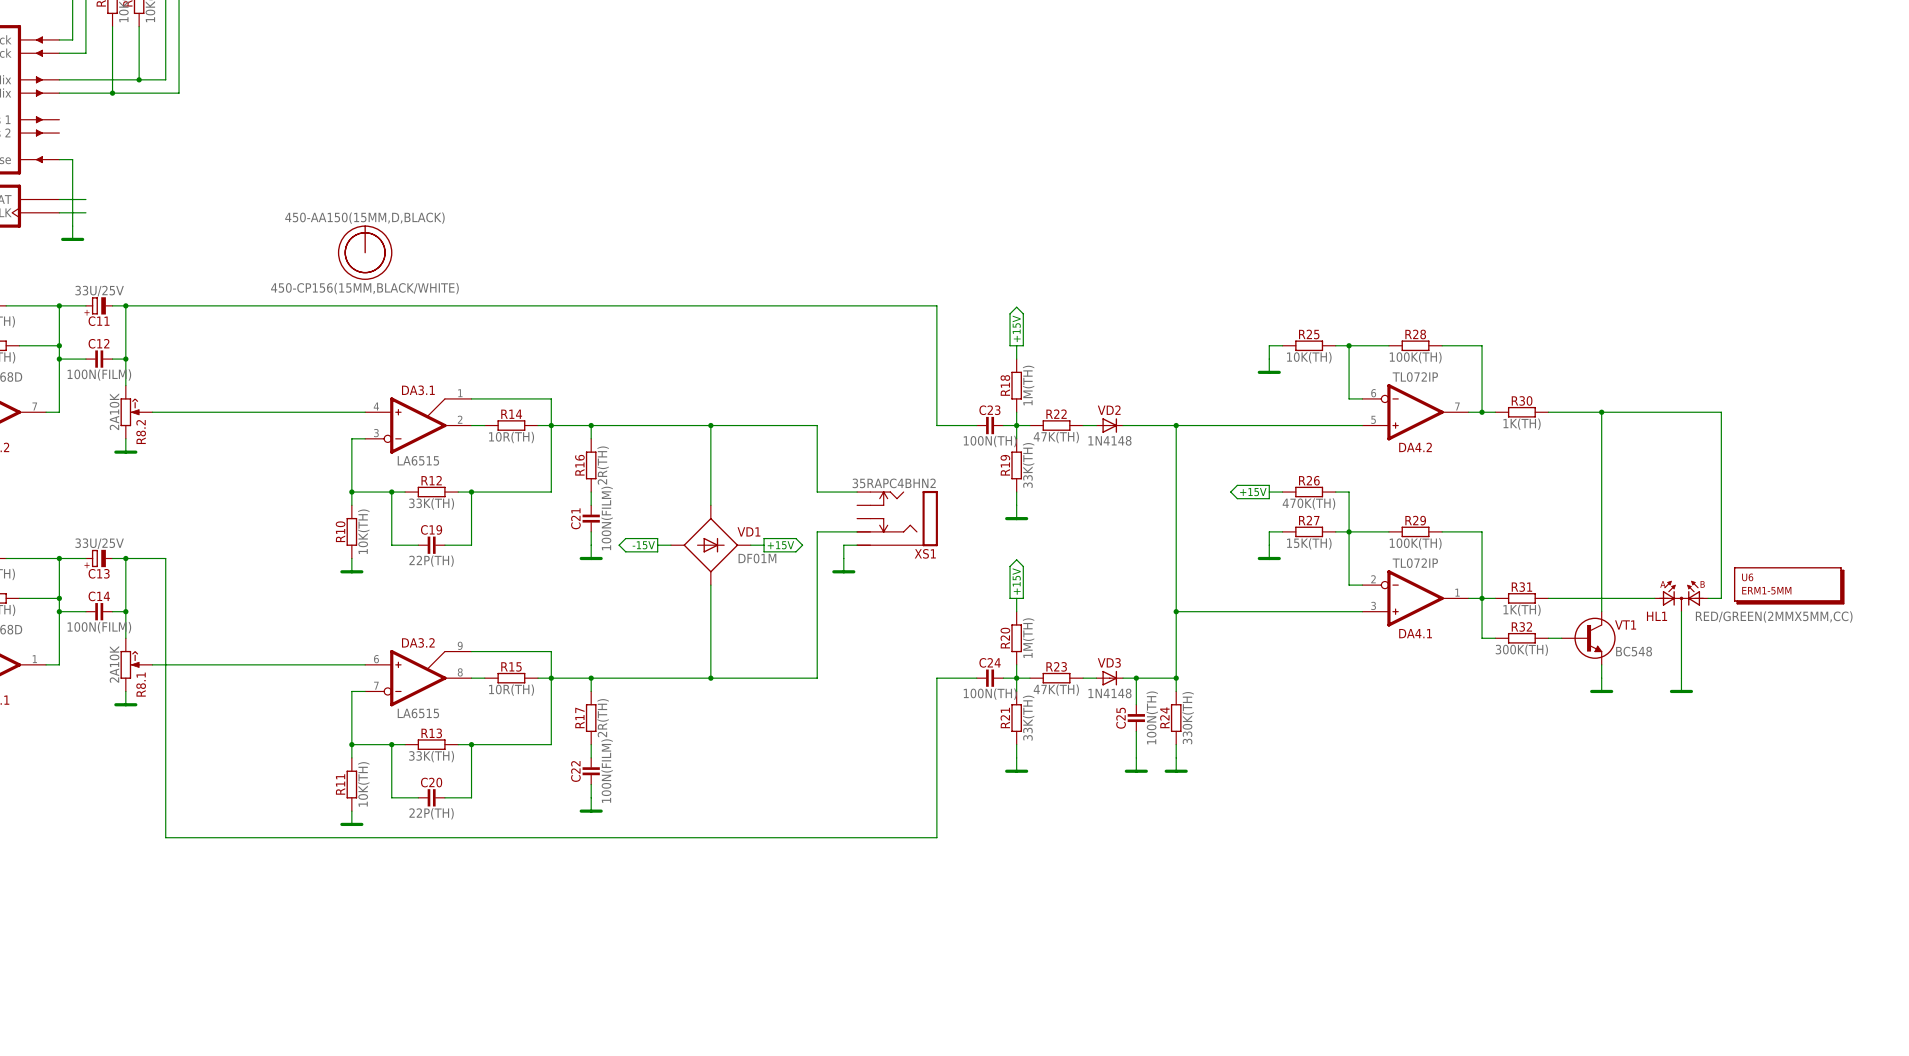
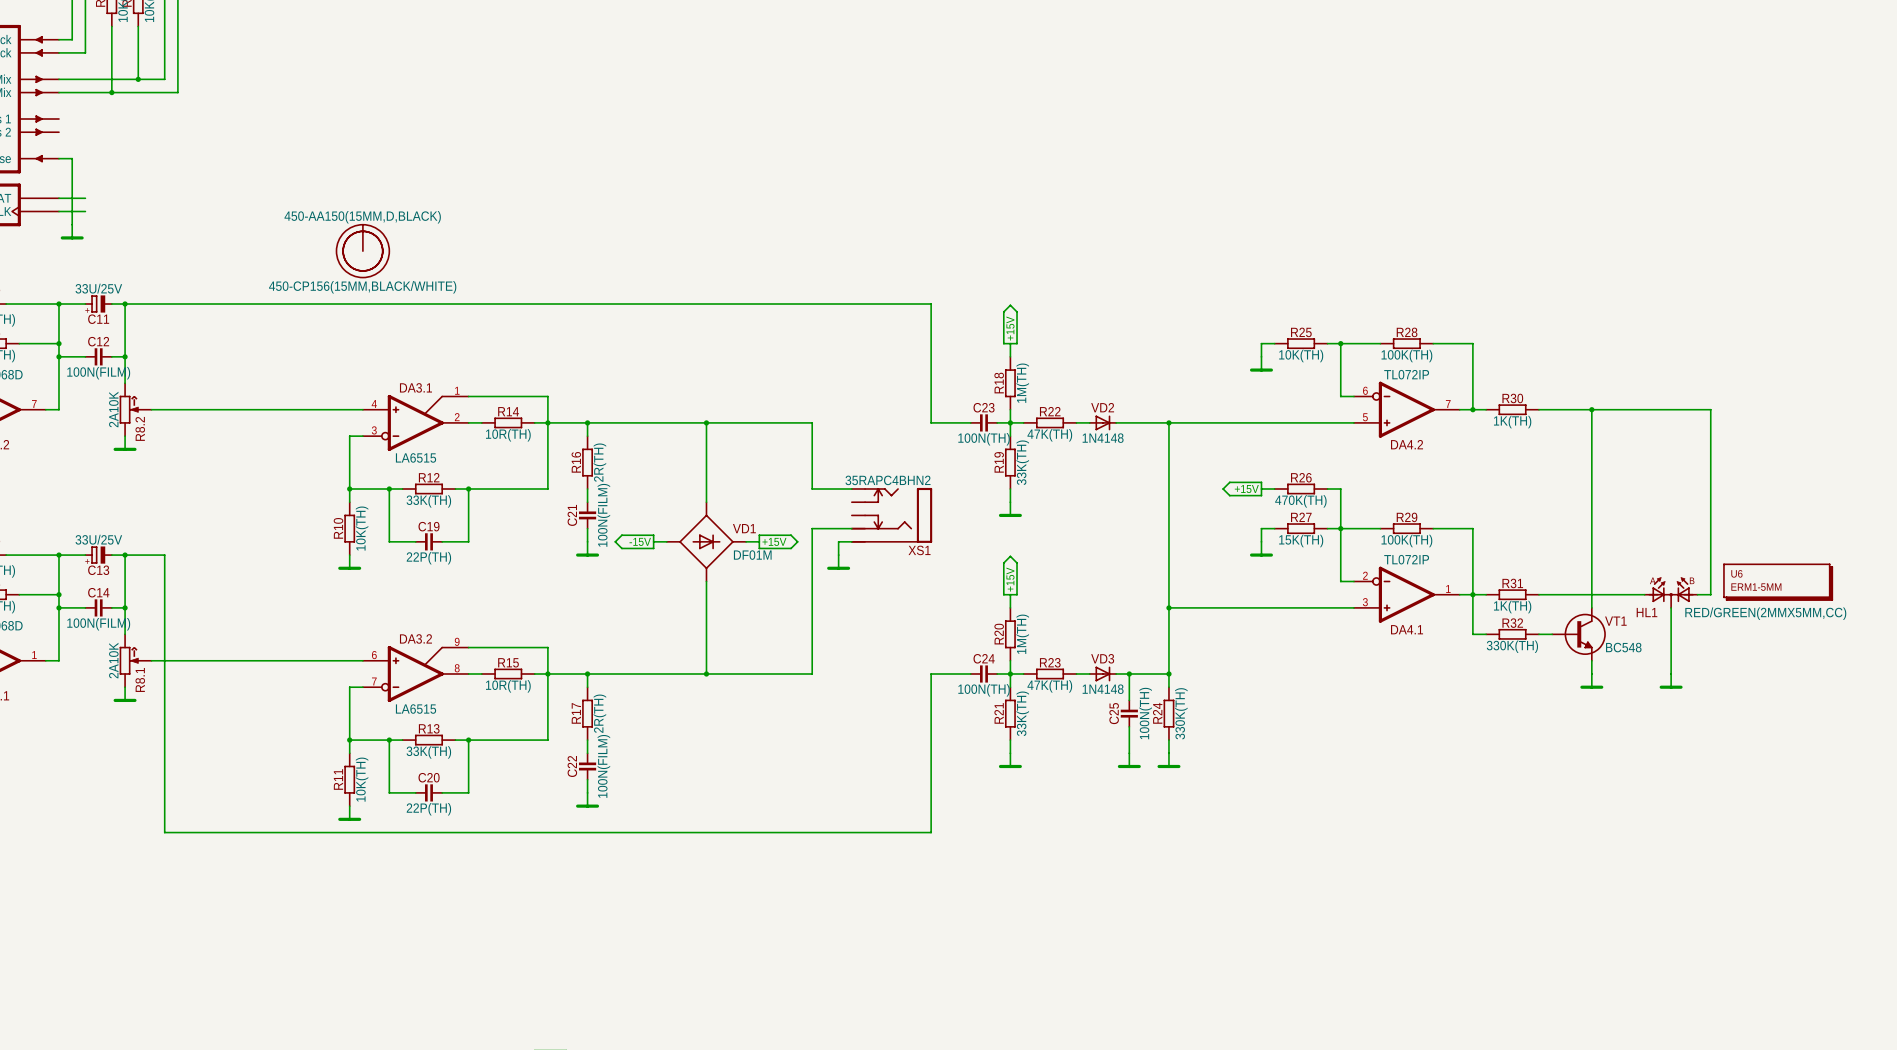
R32 value: 300K(TH) (1521, 650) -> 330K(TH) (1512, 646)

